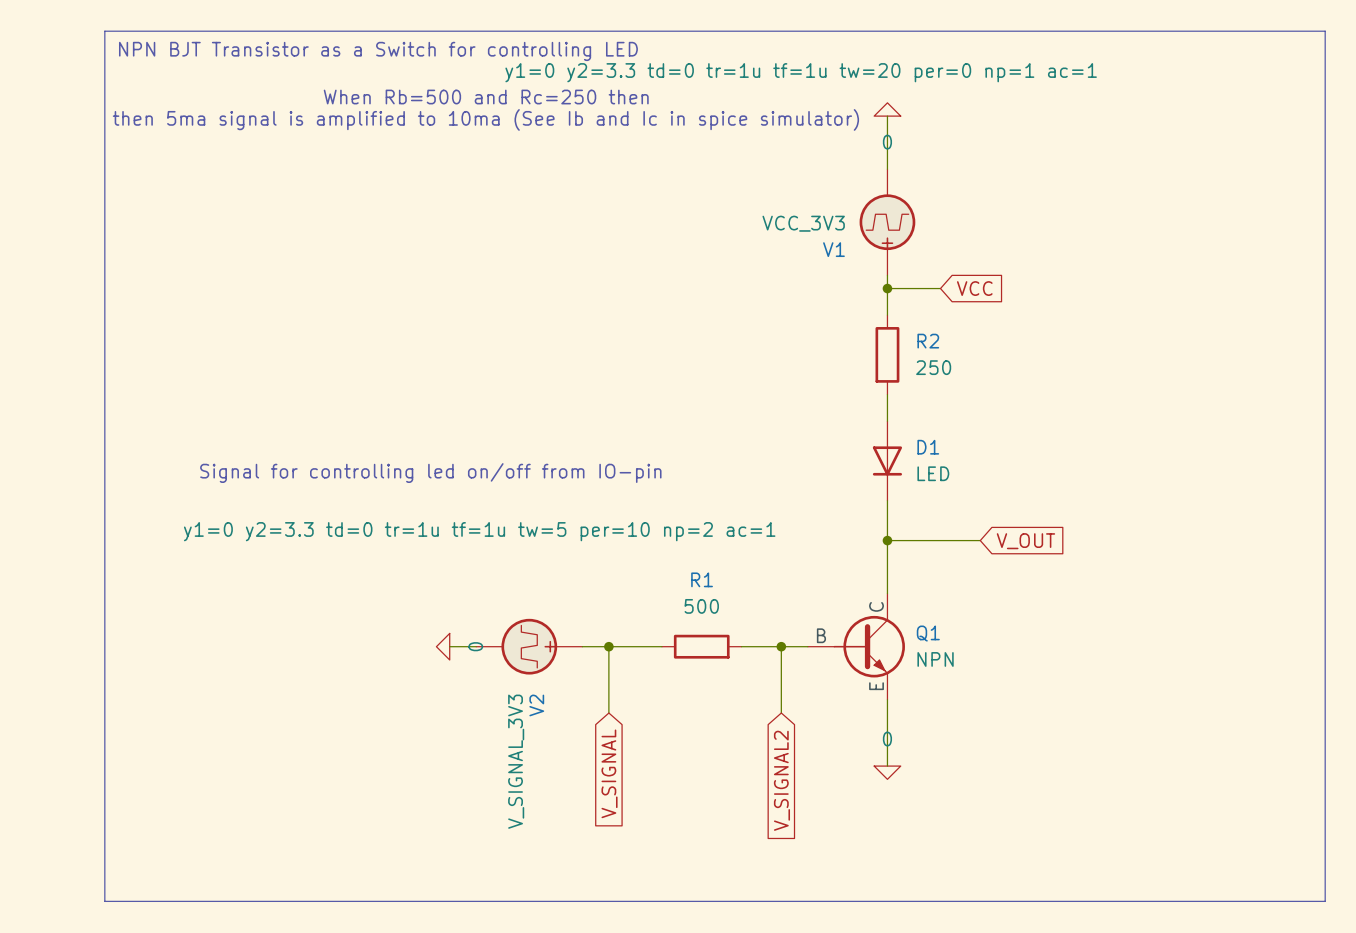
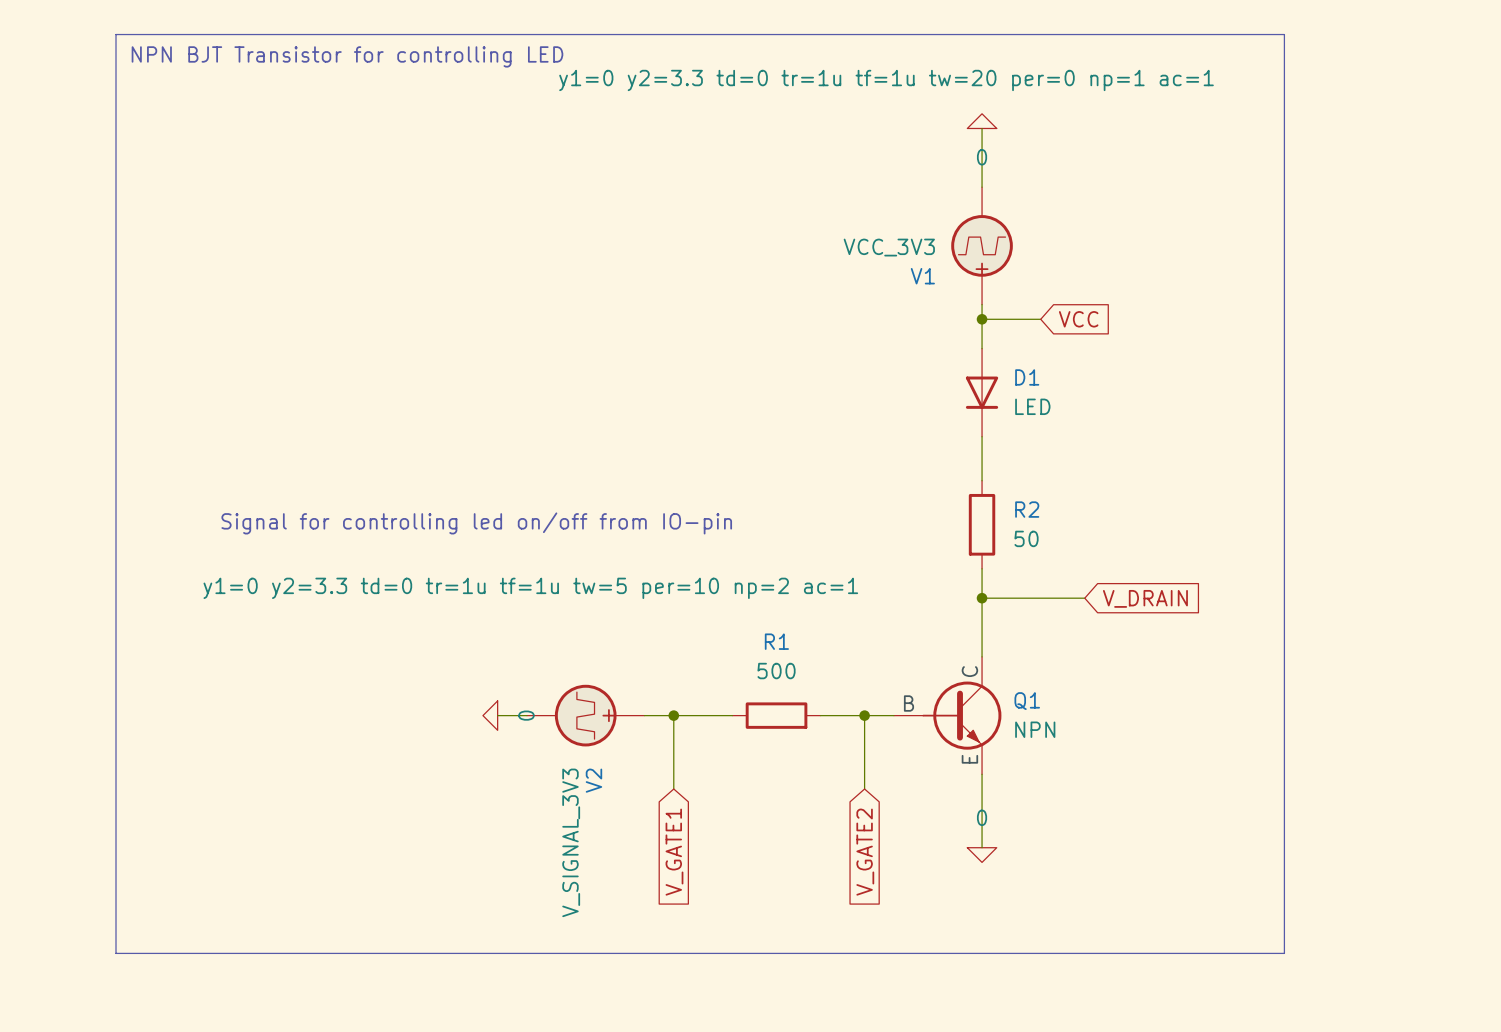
line: (1160, 31) (1325, 31) (1325, 901) (104, 901) (104, 861) -> (1284, 34) (1284, 953) (116, 953)
text: NPN BJT Transistor as a Switch for controlling LED (378, 51) -> NPN BJT Transistor for controlling LED (347, 56)
text: When Rb=500 and Rc=250 then (486, 97) -> none
text: then 5ma signal is amplified to 10ma (See Ib and Ic in spice simulator) (485, 119) -> none
R2 position: (887, 354) -> (982, 524)
R2 value: 250 (933, 367) -> 50 (1026, 538)
D1 position: (887, 460) -> (982, 392)
global label: V_OUT (1025, 541) -> V_DRAIN (1145, 598)
global label: V_SIGNAL (609, 773) -> V_GATE1 (674, 852)
global label: V_SIGNAL2 (781, 780) -> V_GATE2 (865, 852)

